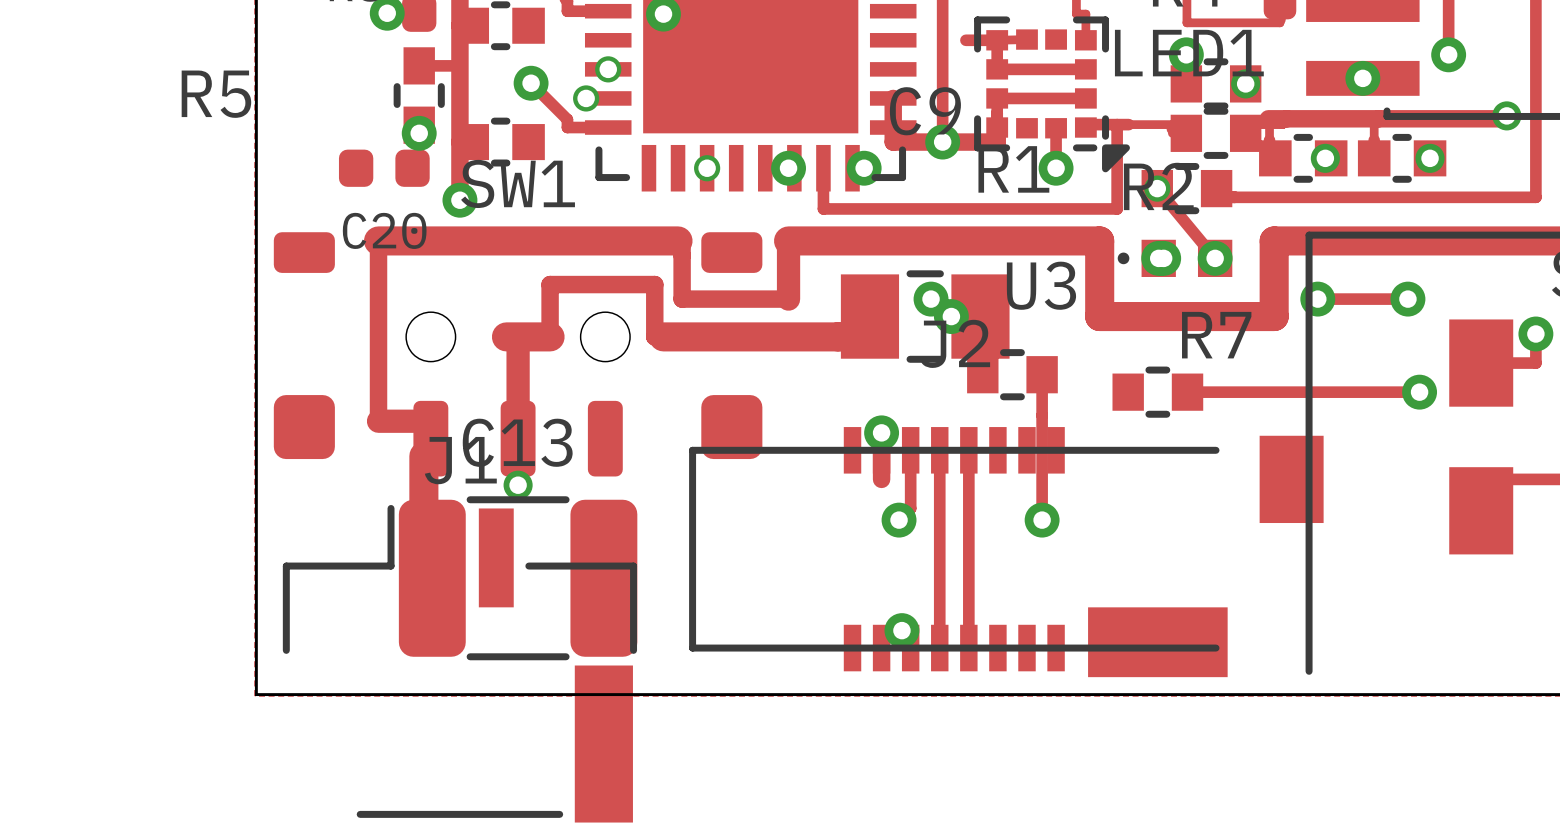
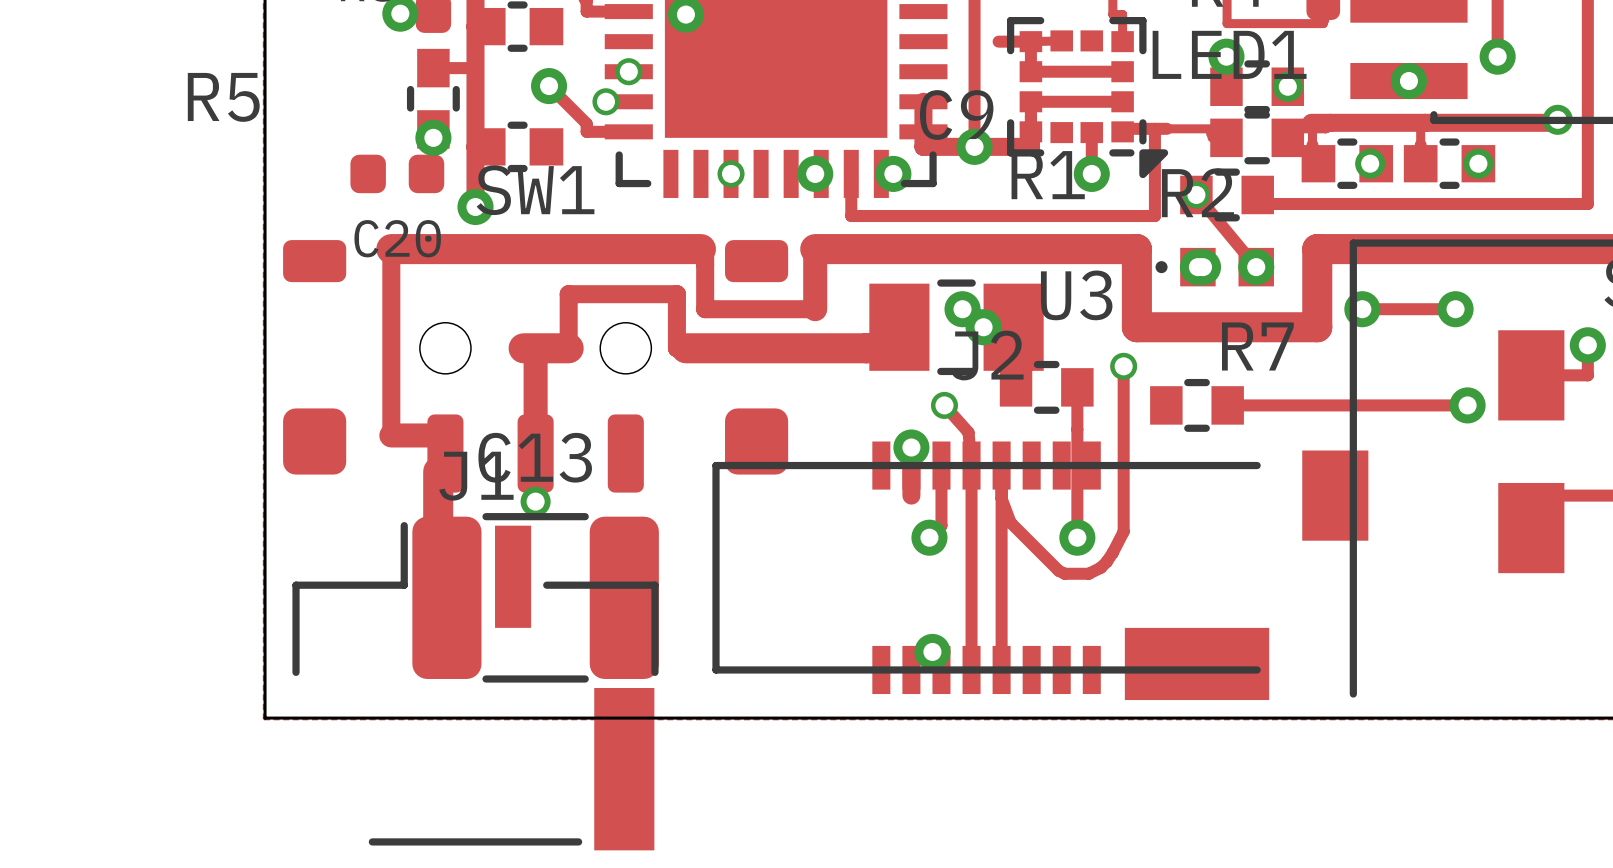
track: none -> (1123, 366) (1123, 531) (1106, 561) (1100, 567) (1088, 573) (1064, 573) (1058, 570) (1010, 522) (1001, 498)
via: none -> (1123, 366)
track: none -> (944, 405) (968, 432) (971, 465)
via: none -> (944, 405)

